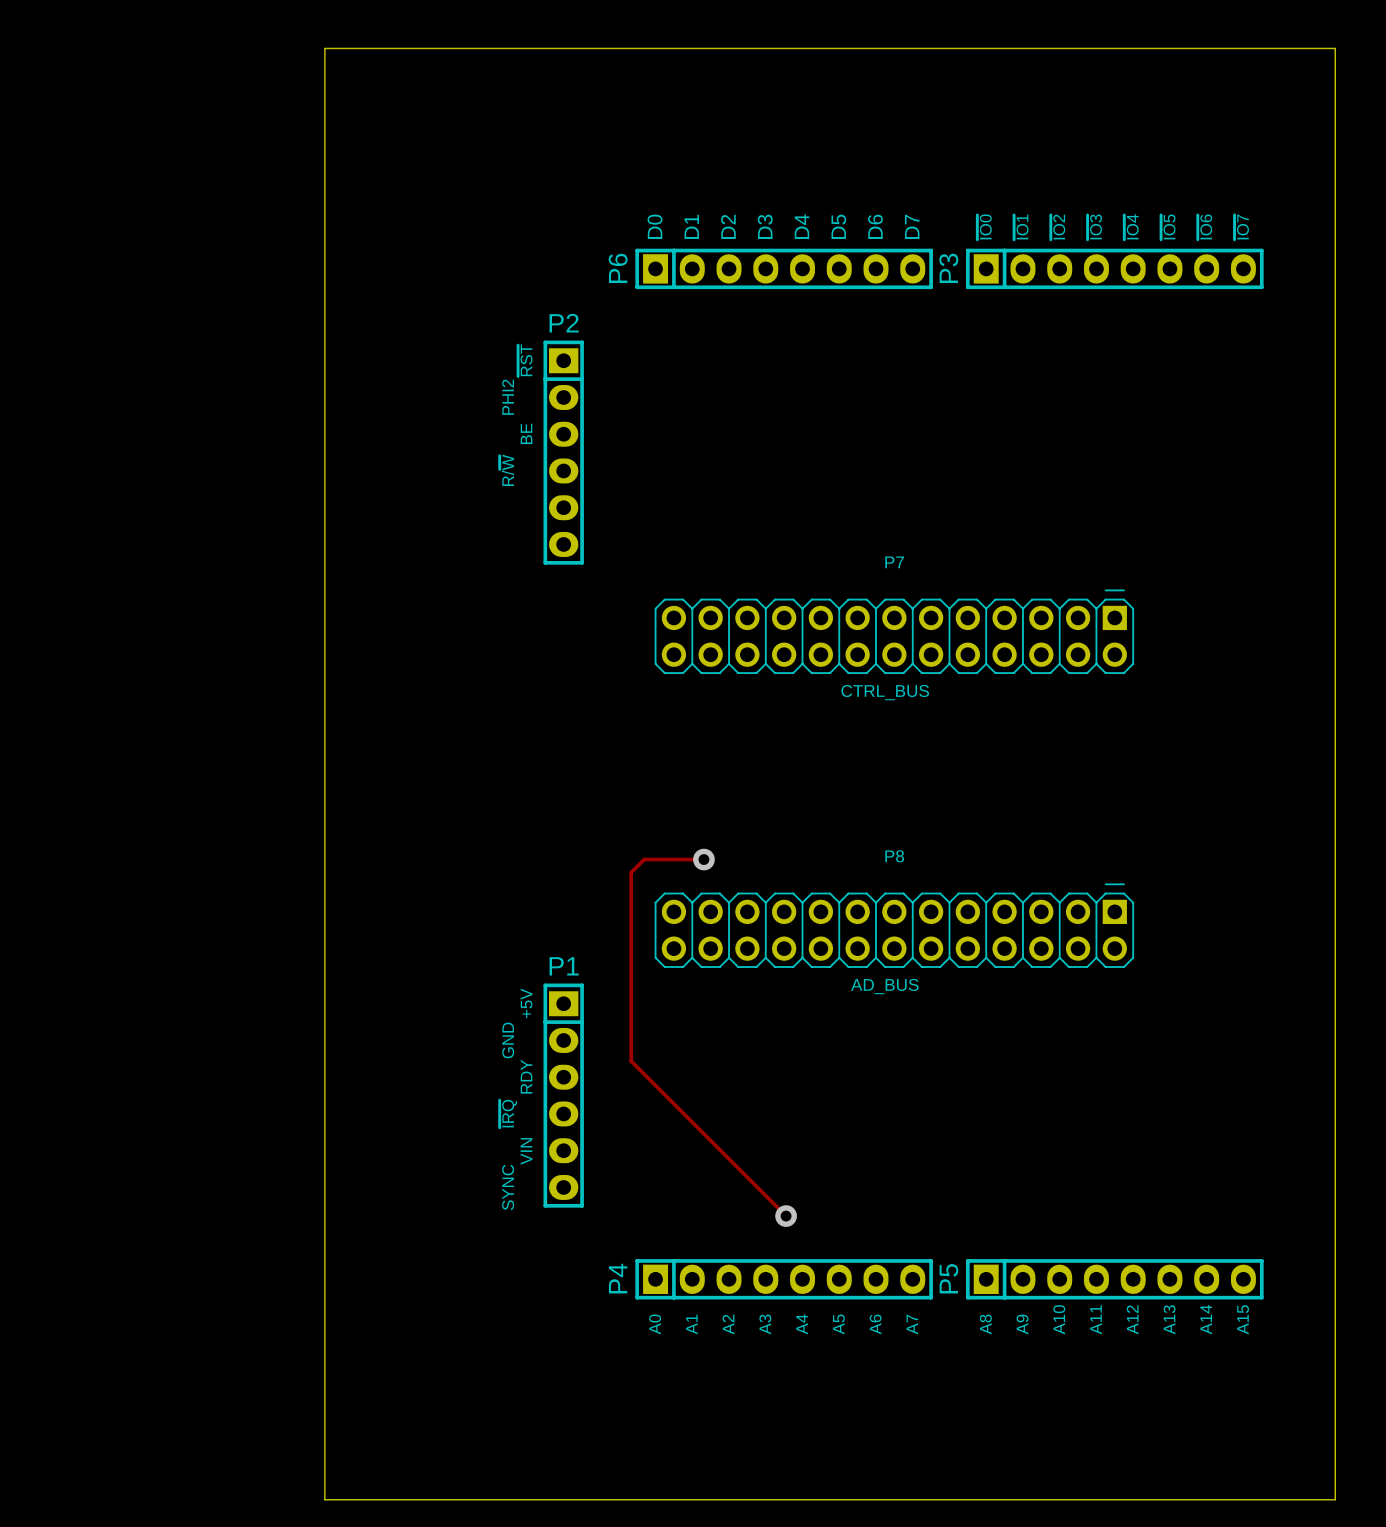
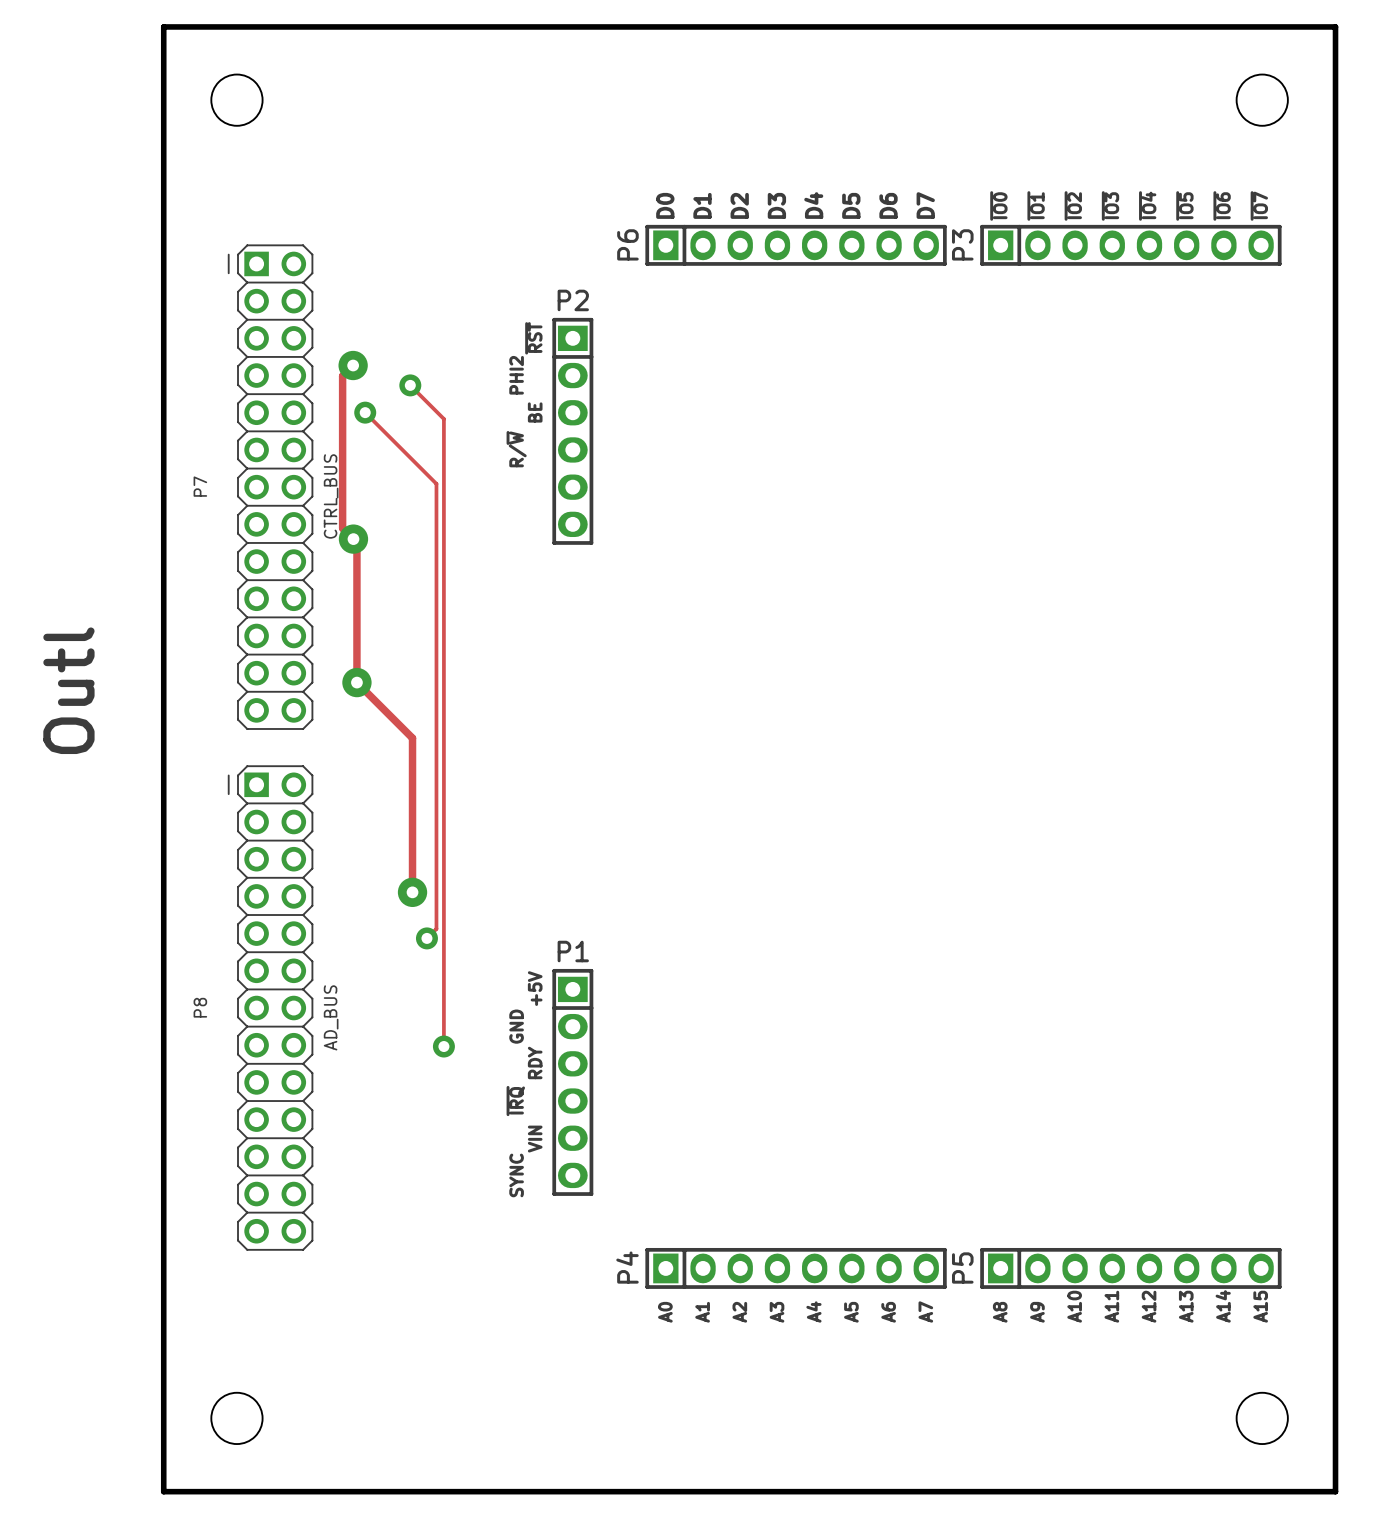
board edge: (324, 48) (324, 1499) (1335, 1499) (1335, 48) (324, 48) -> none
track: none -> (353, 365) (342, 376) (342, 528) (356, 542) (356, 682) (412, 738) (412, 892)
via: none -> (353, 365)
track: none -> (410, 385) (443, 419) (443, 1046)
via: none -> (410, 385)
track: none -> (365, 412) (436, 483) (436, 928) (426, 938)
via: none -> (365, 412)
via: none -> (353, 539)
P7 rotation: 0° (894, 631) -> 90° counterclockwise (270, 487)
P7 position: (894, 631) -> (270, 487)
via: none -> (356, 682)
Outl: none -> (749, 759)
track: (703, 859) (644, 859) (631, 872) (631, 1061) (786, 1216) -> none
via: (703, 859) -> none
via: none -> (412, 892)
P8 rotation: 0° (894, 925) -> 90° counterclockwise (270, 1008)
P8 position: (894, 925) -> (270, 1008)
via: none -> (426, 938)
via: none -> (443, 1046)
via: (786, 1216) -> none

